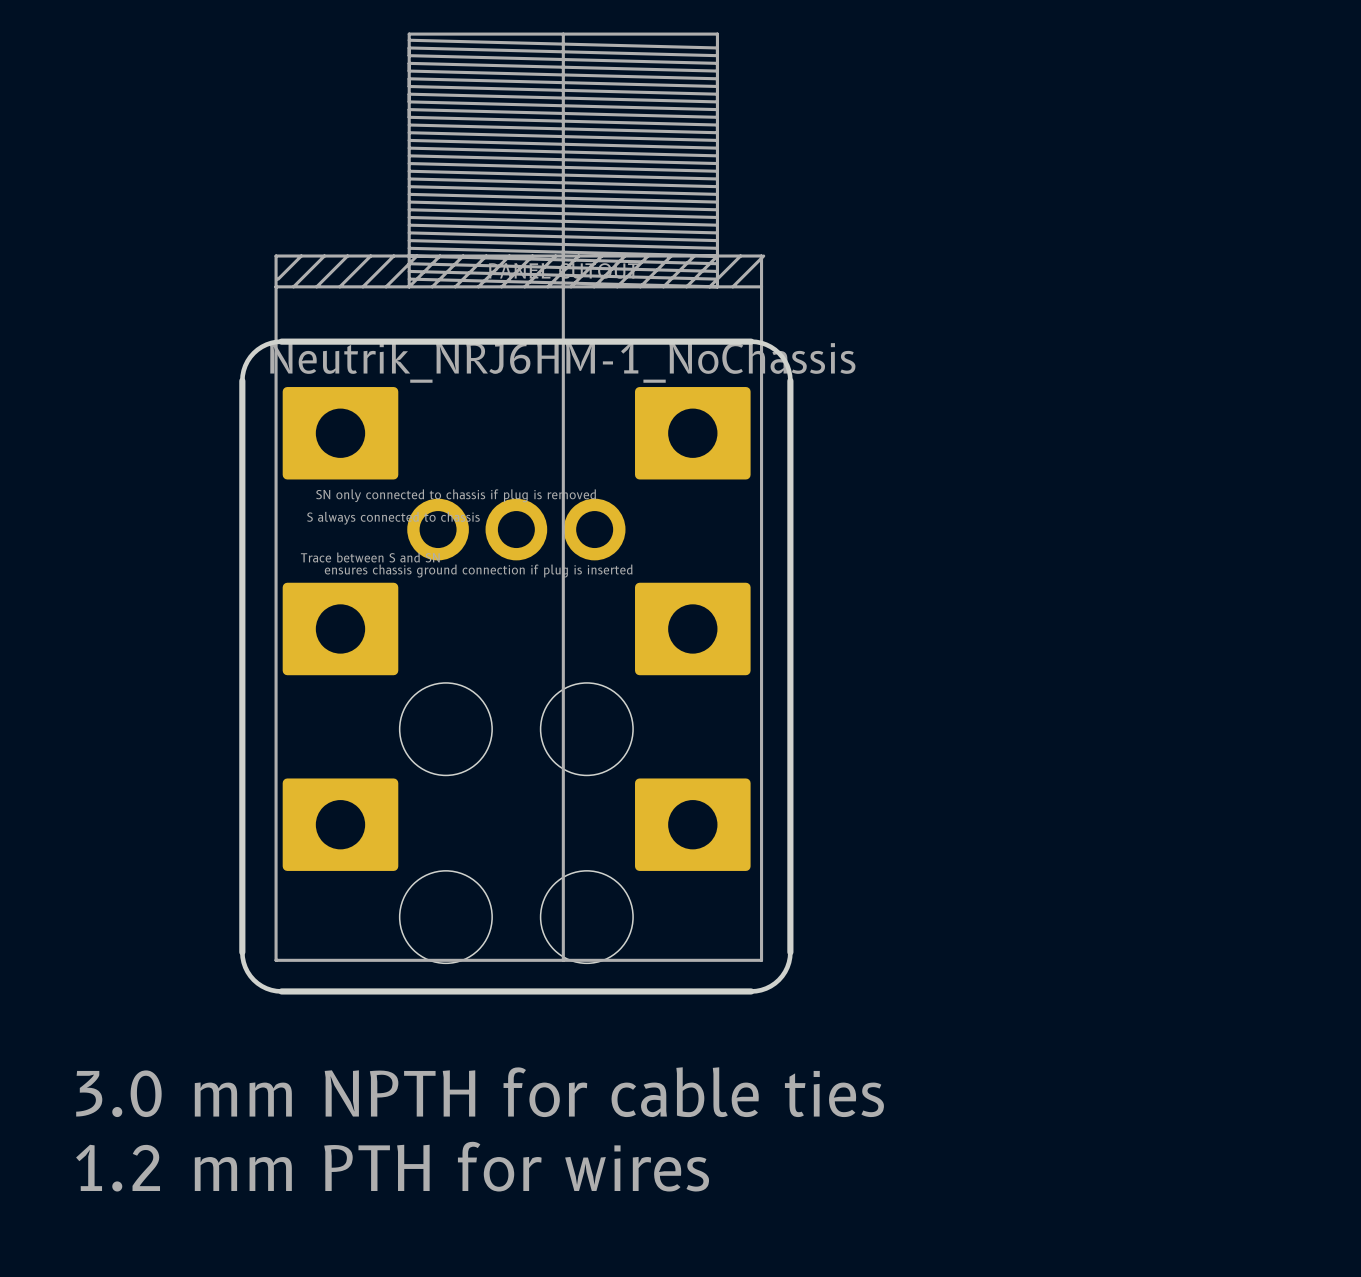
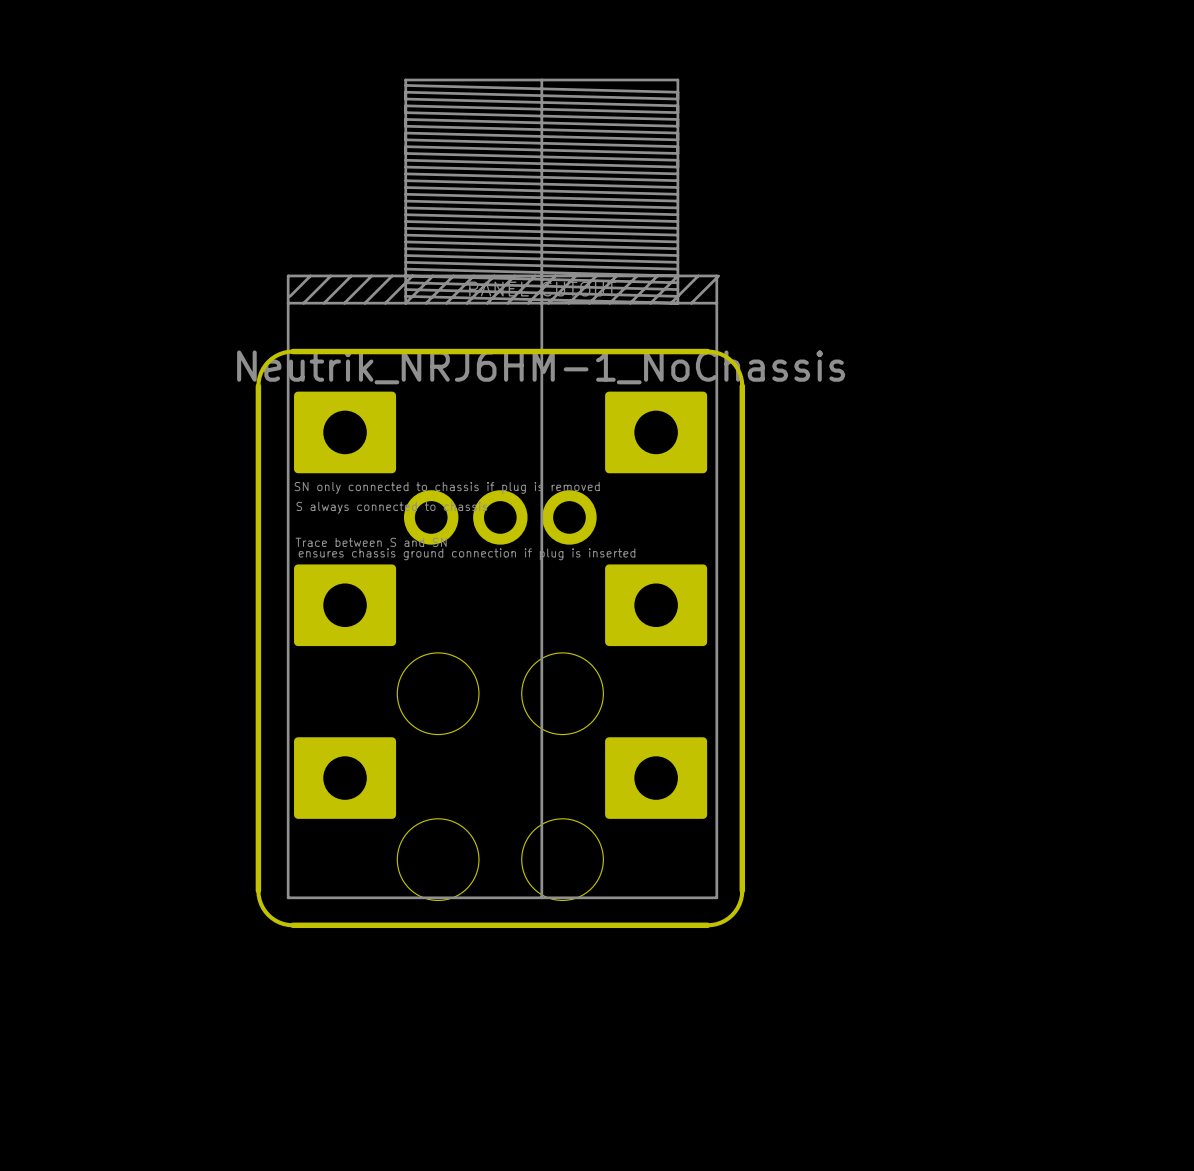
text: 3.0 mm NPTH for cable ties (480, 1092) -> none
text: 1.2 mm PTH for wires (392, 1166) -> none

